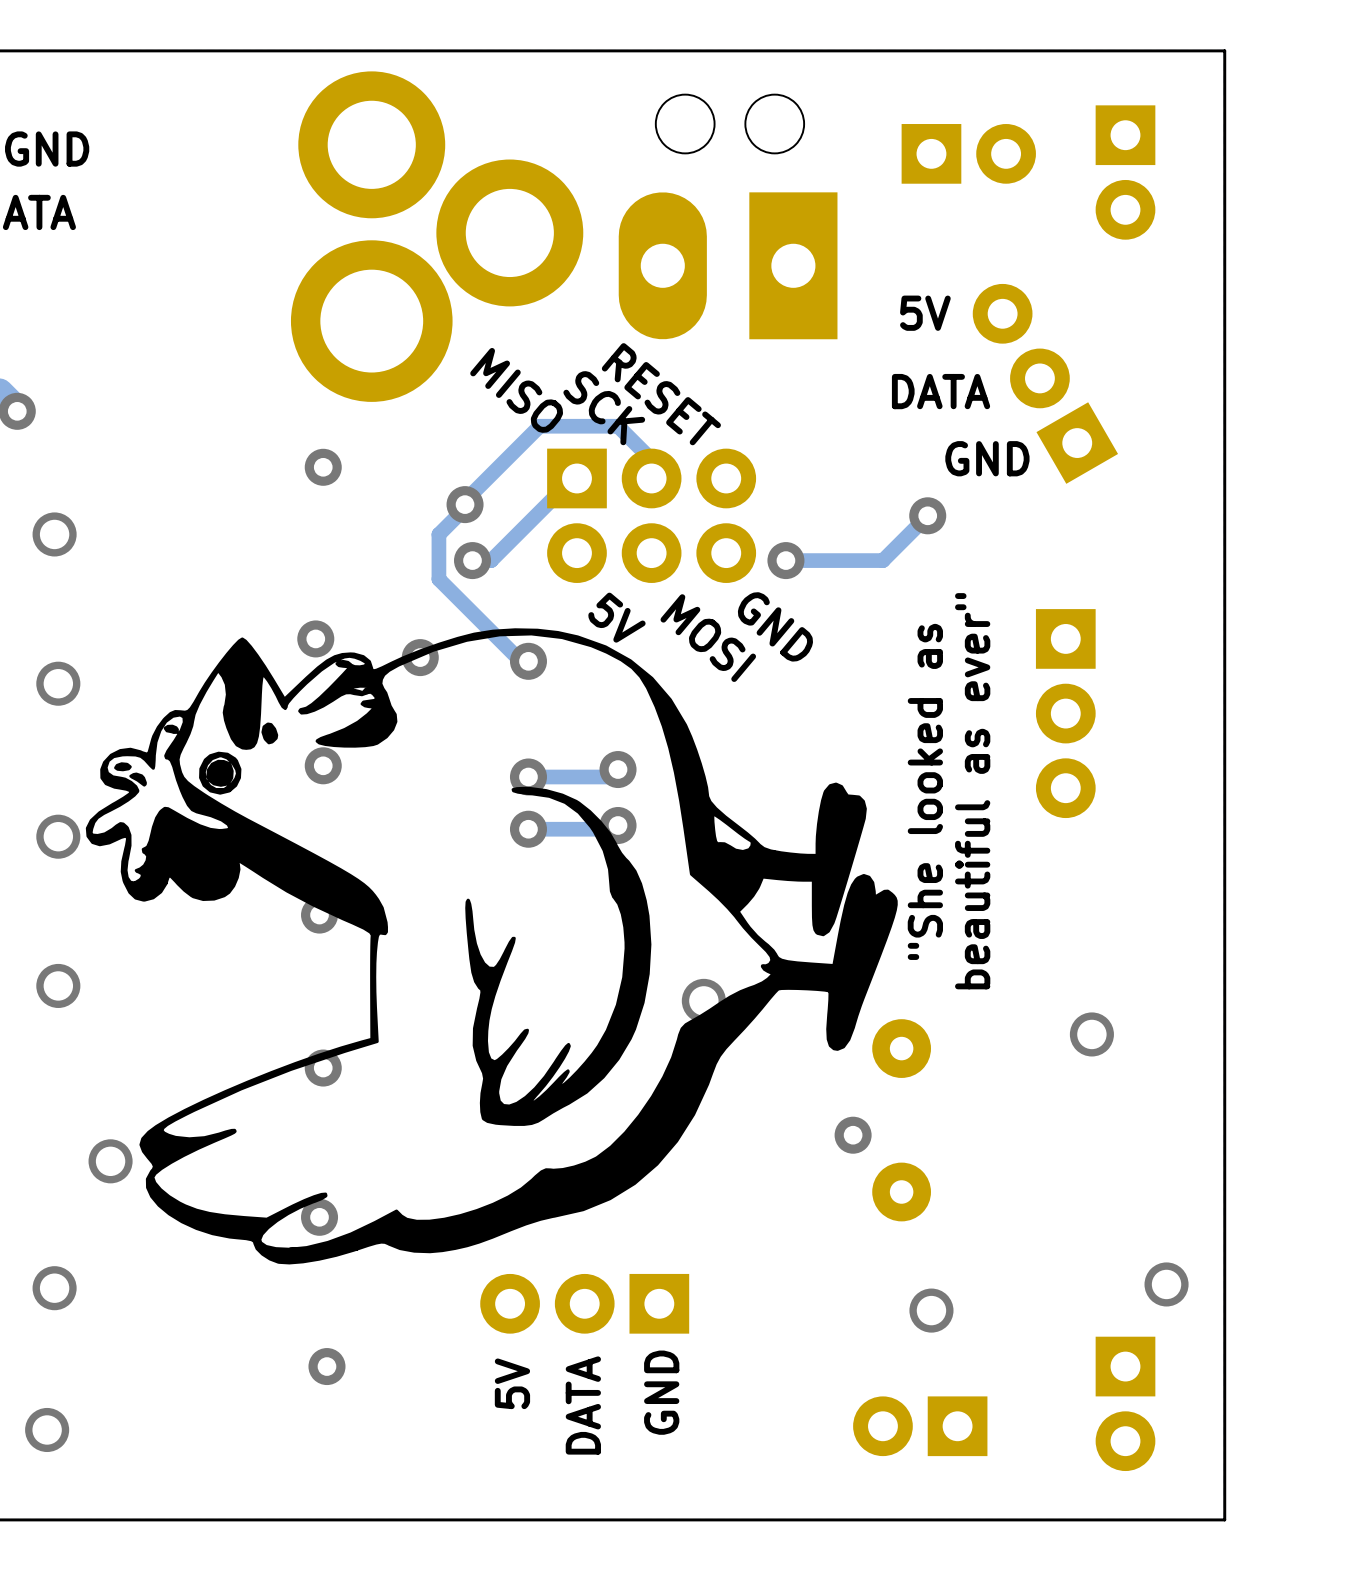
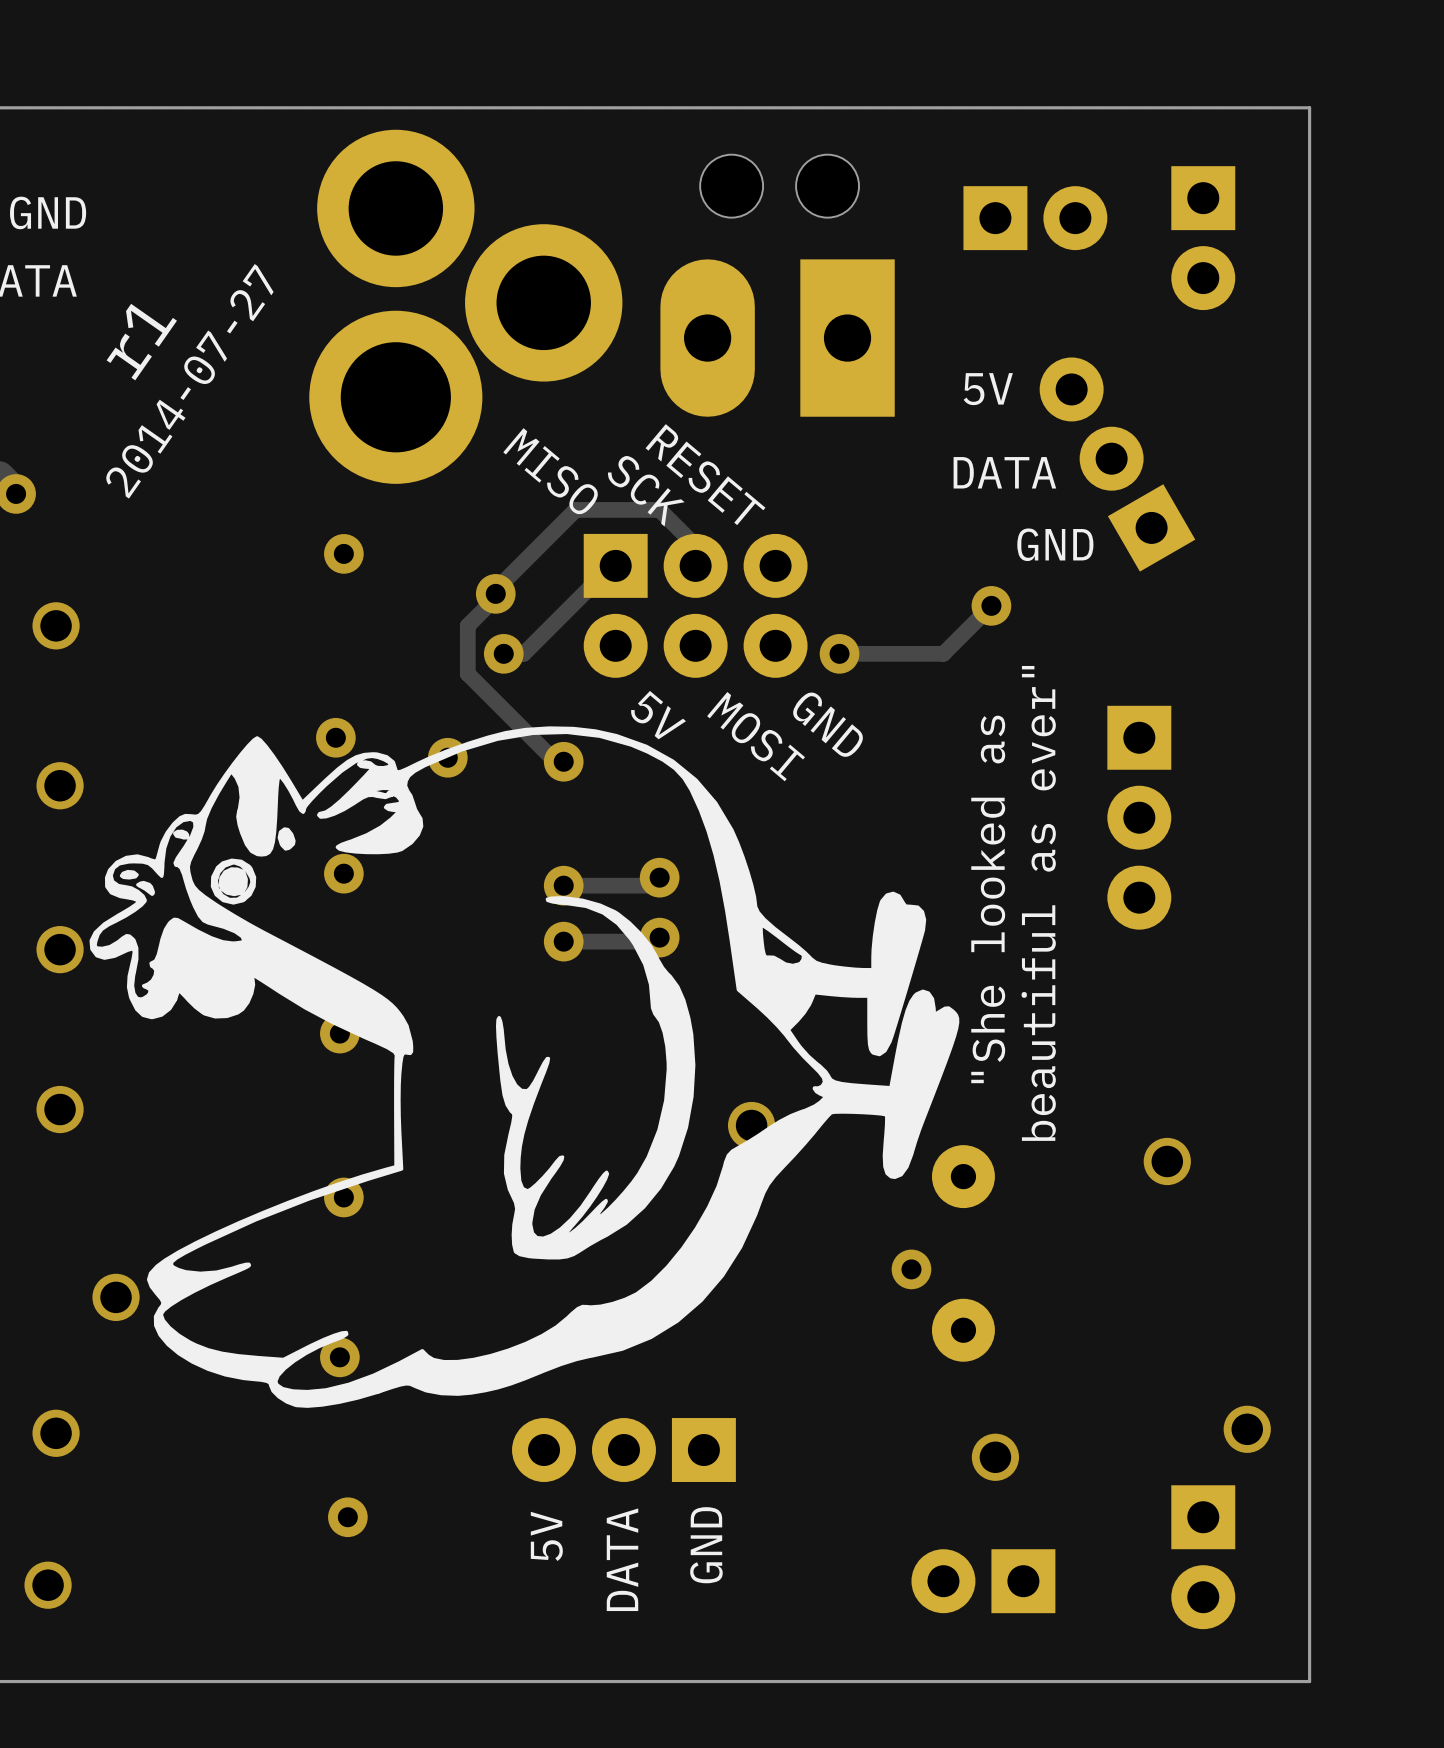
text: none -> r1 (141, 342)
text: none -> 2014-07-27 (189, 381)

